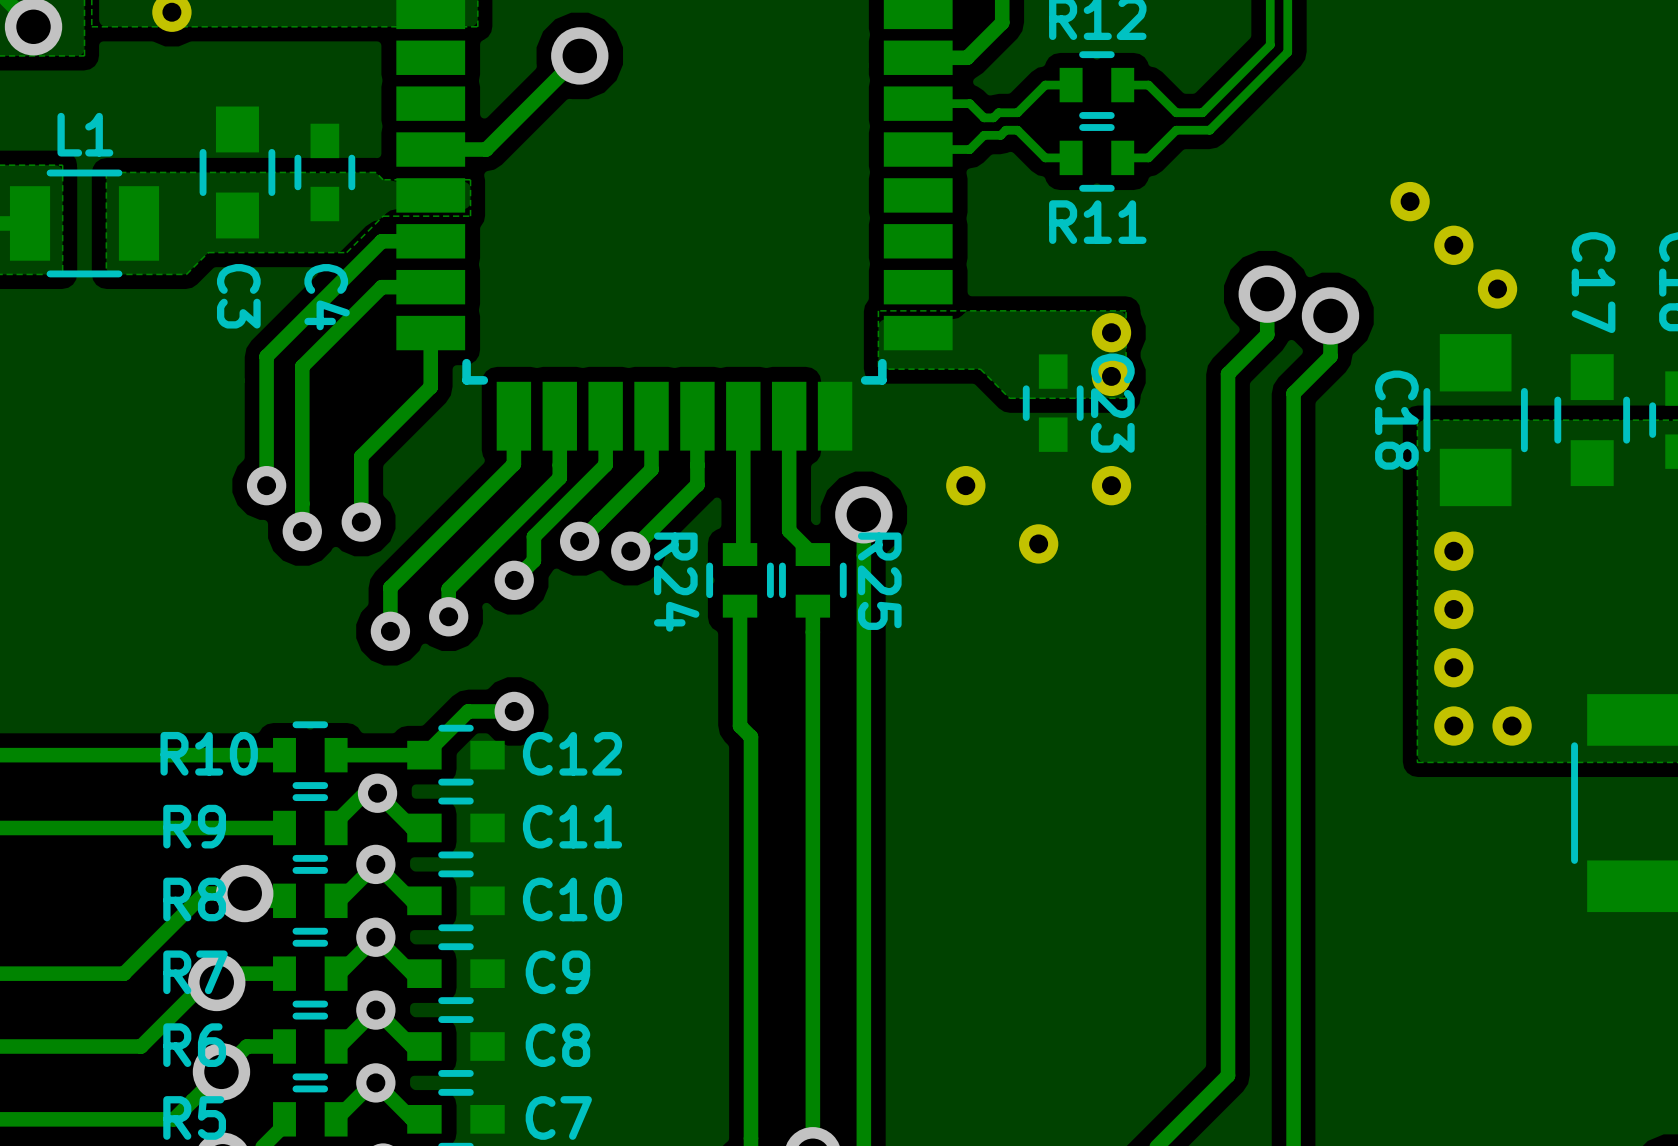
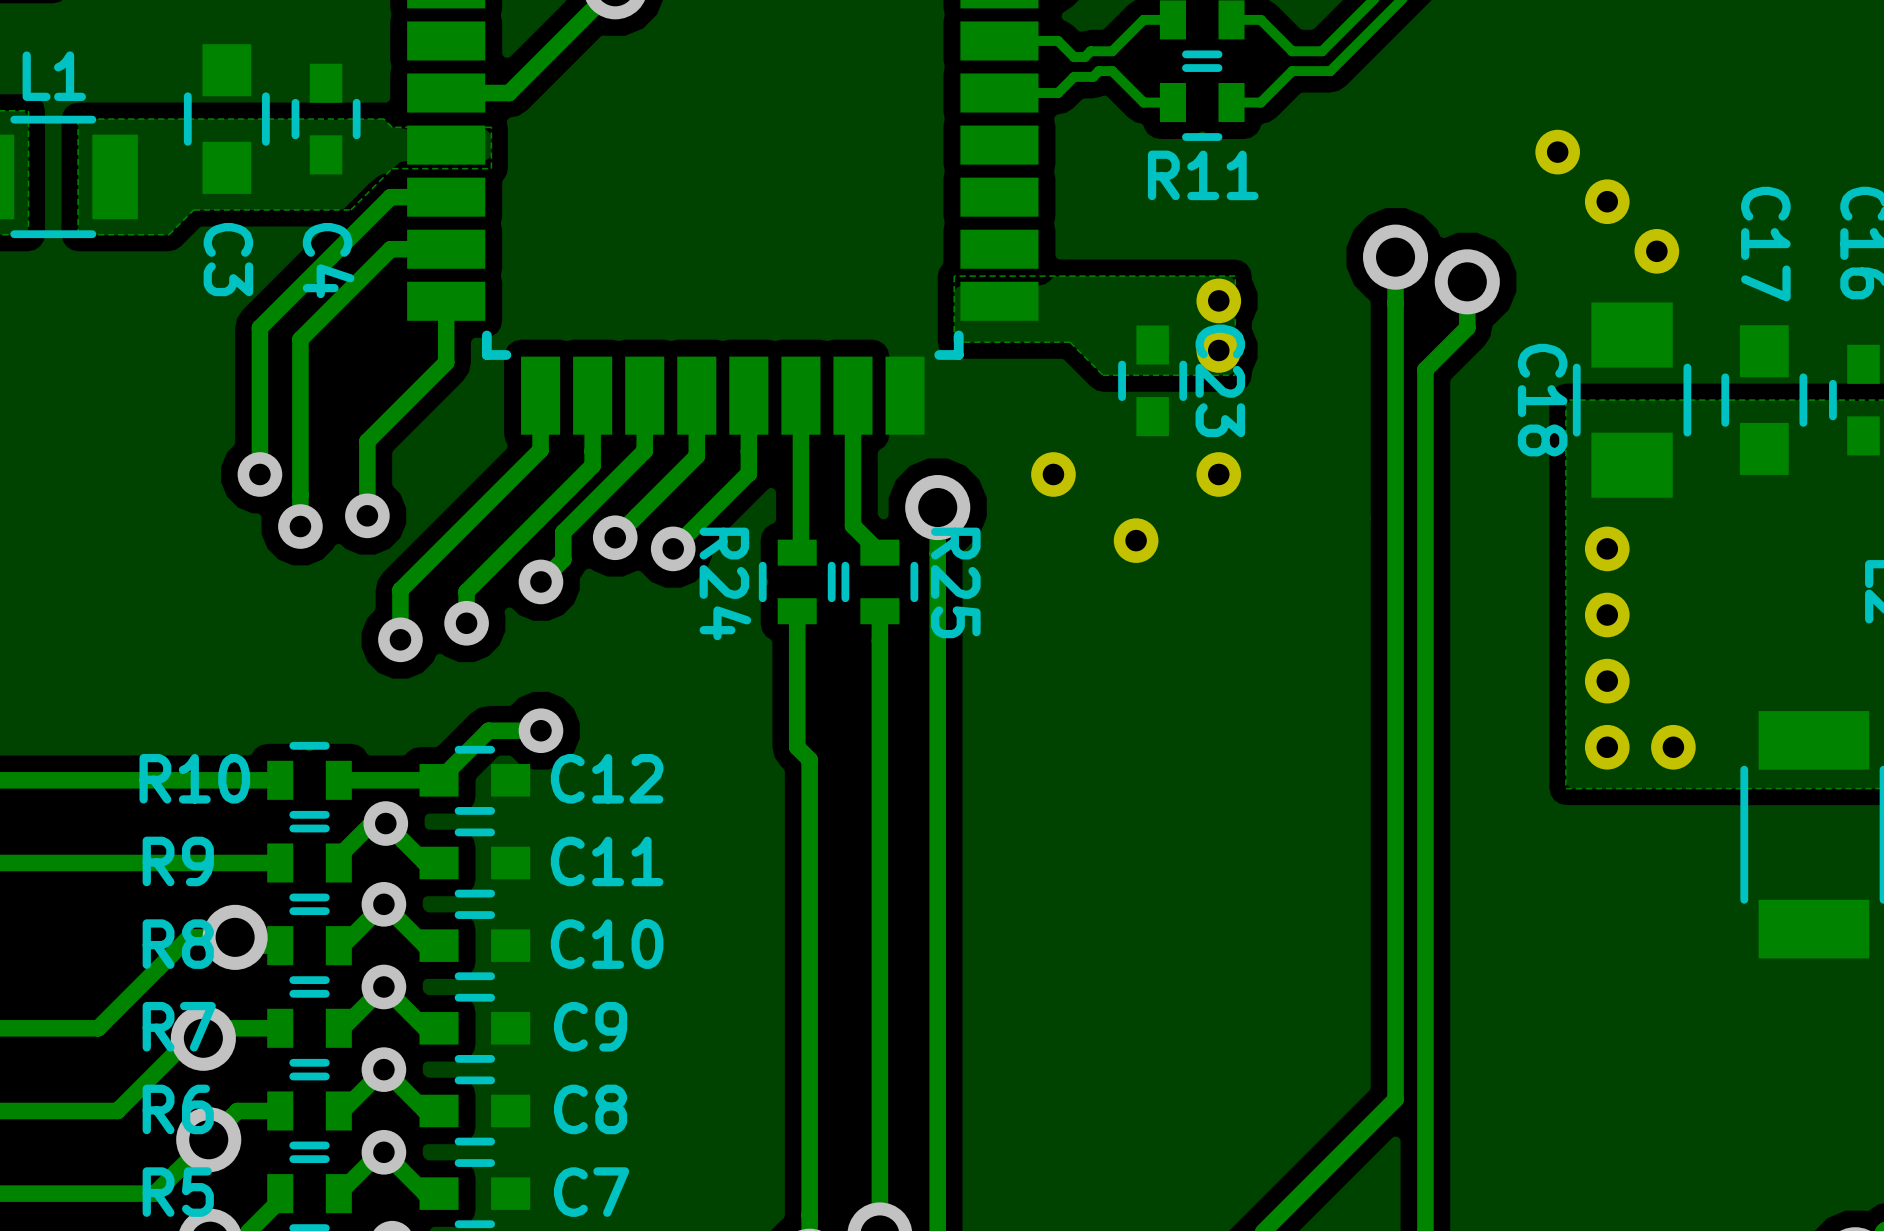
track: (1267, 334) (1228, 373) (1228, 1075) -> (1395, 303) (1395, 1099) (1351, 1144)

